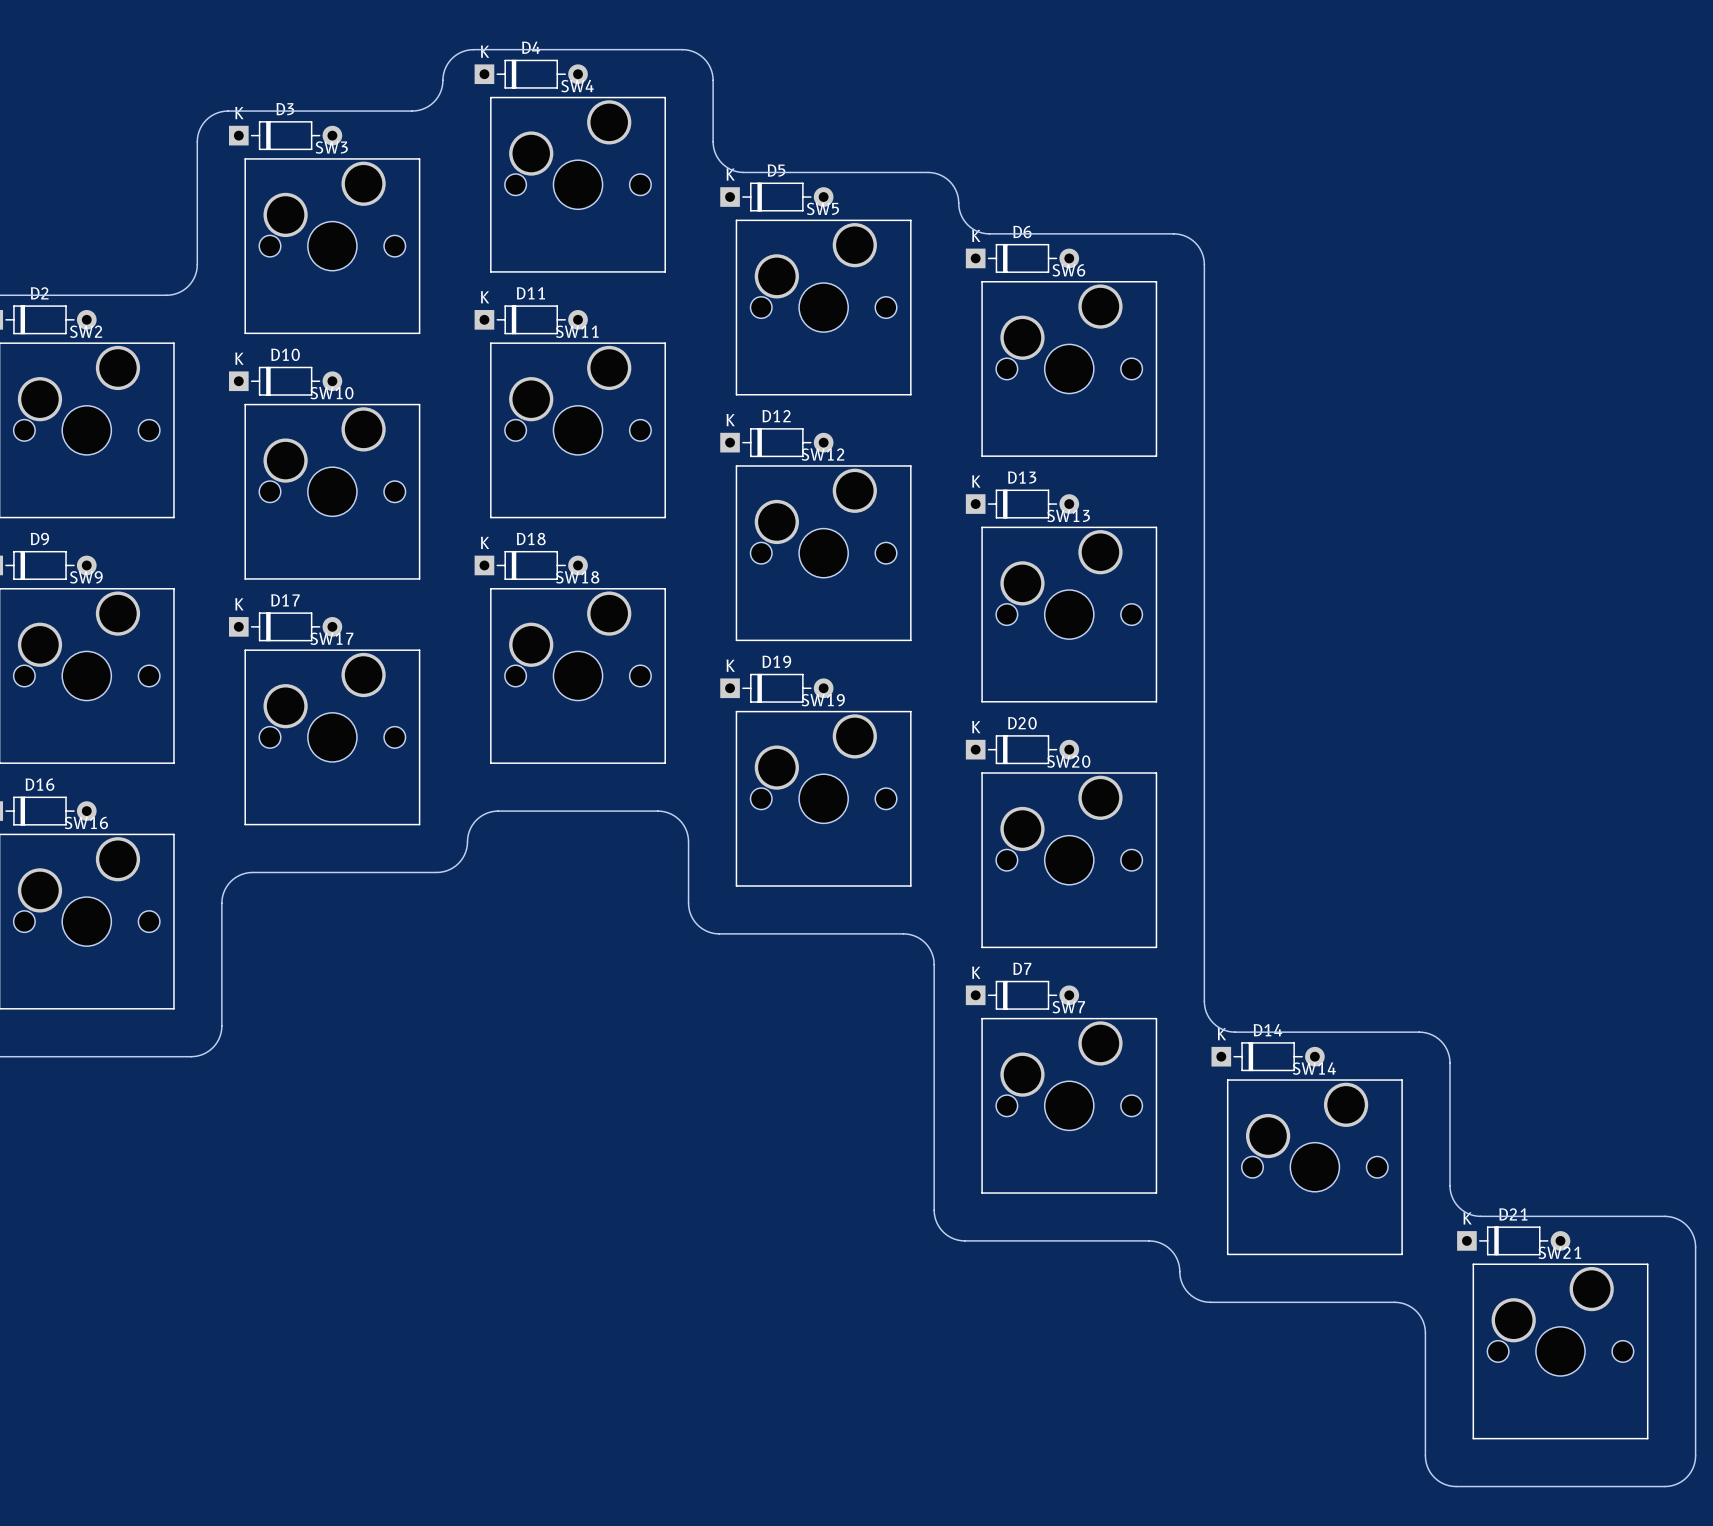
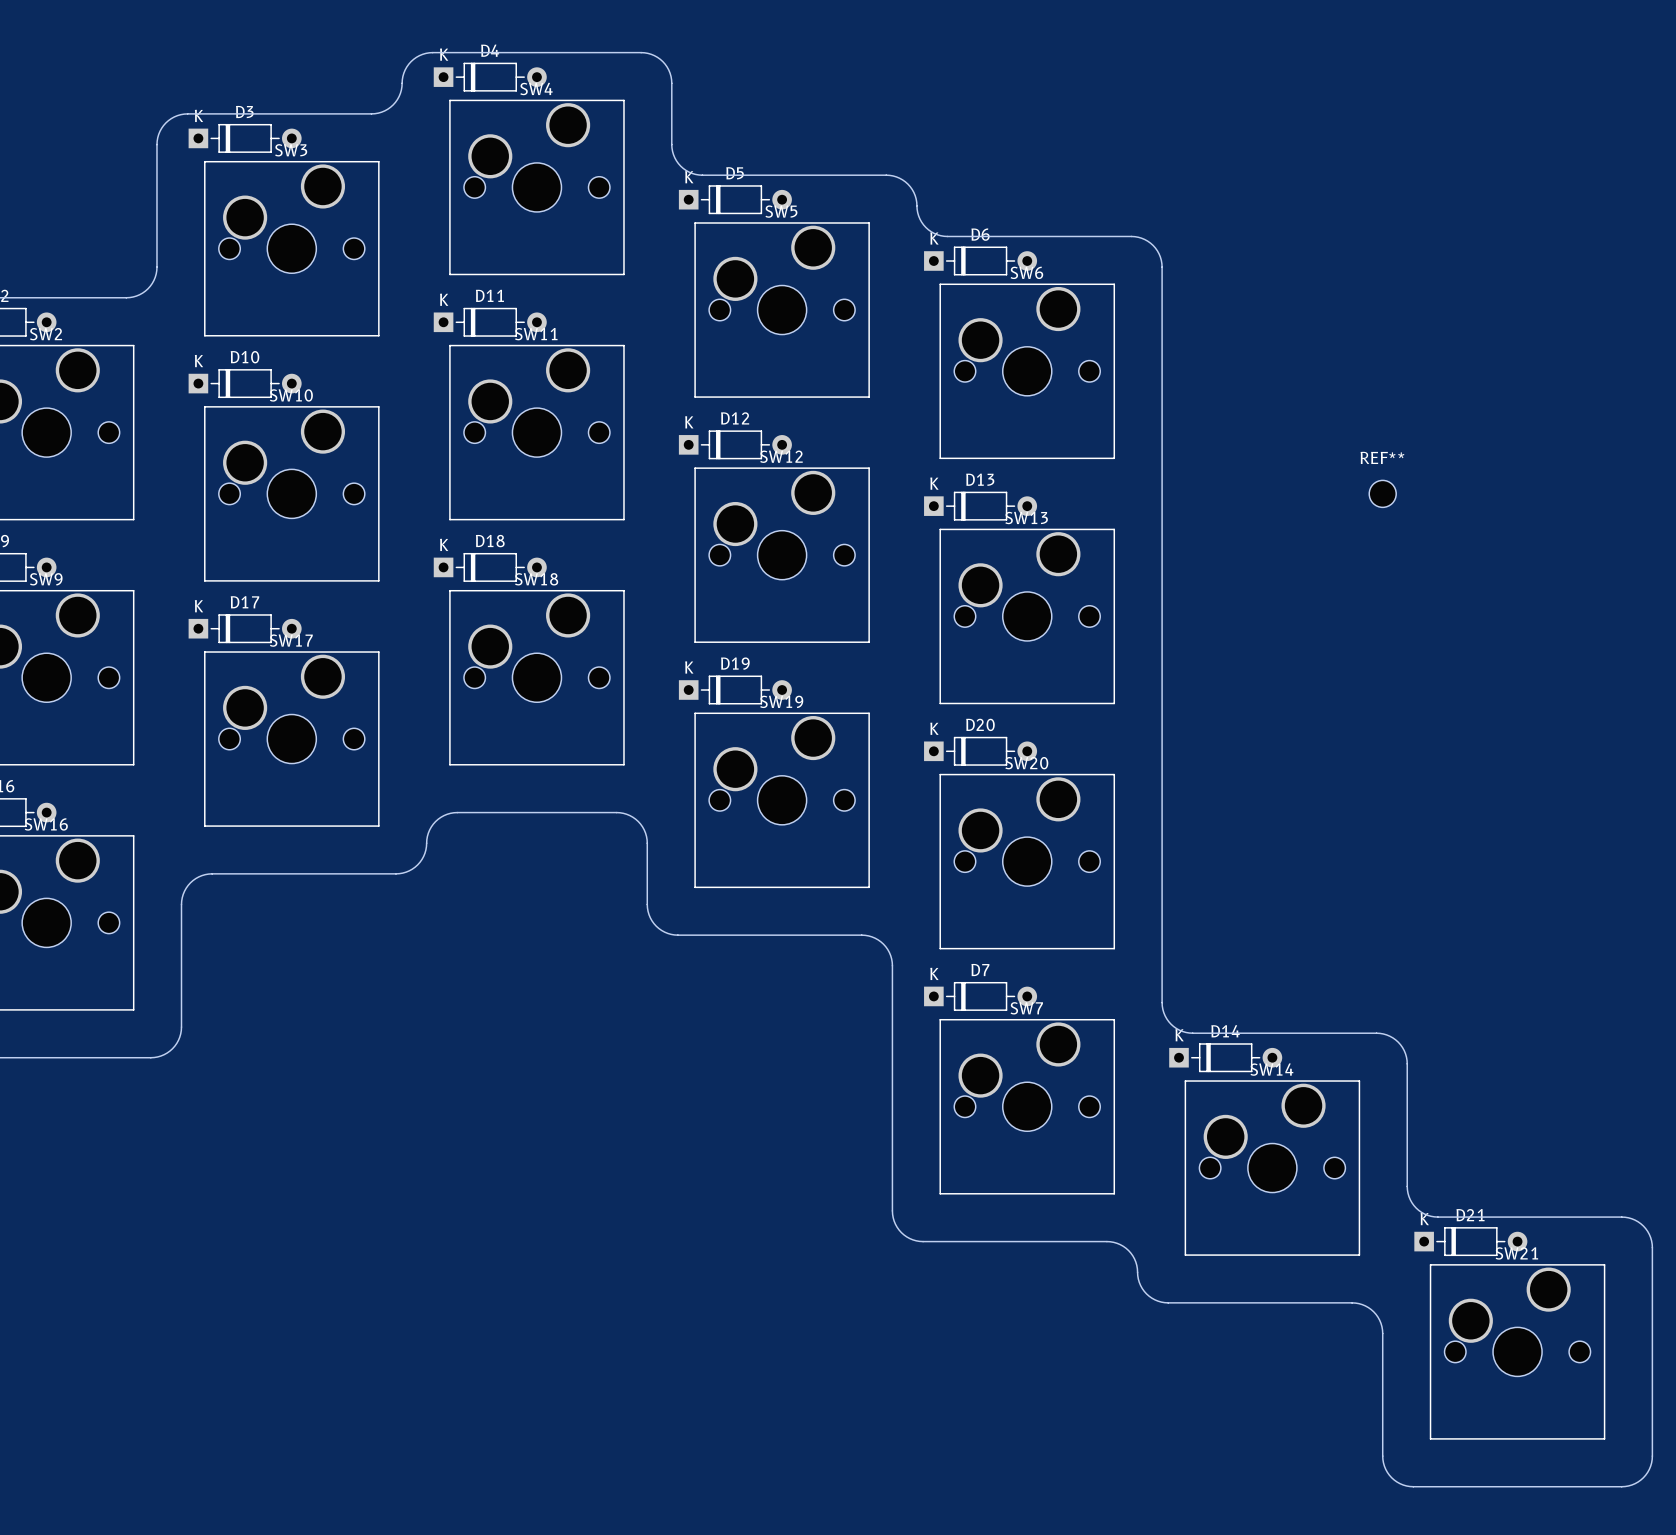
REF**: none -> (1382, 493)

